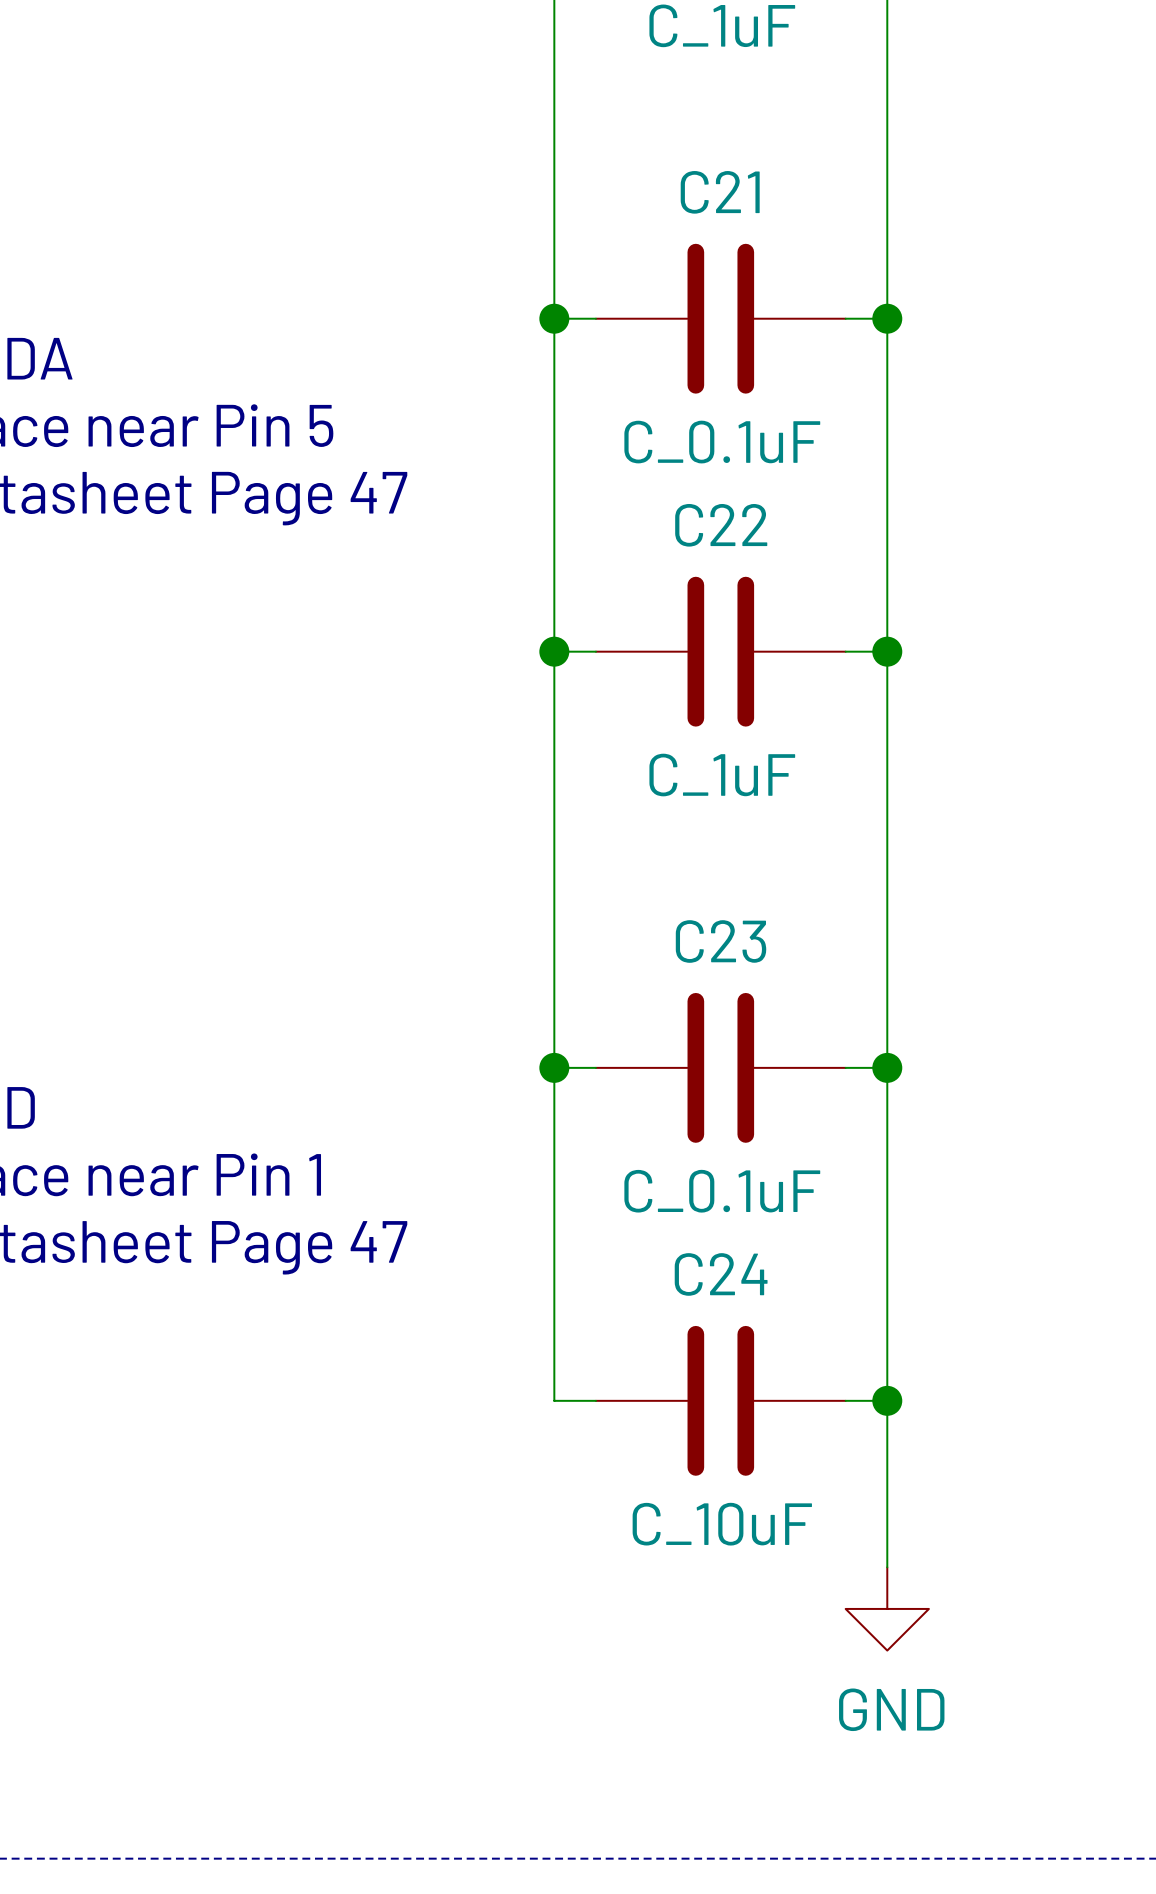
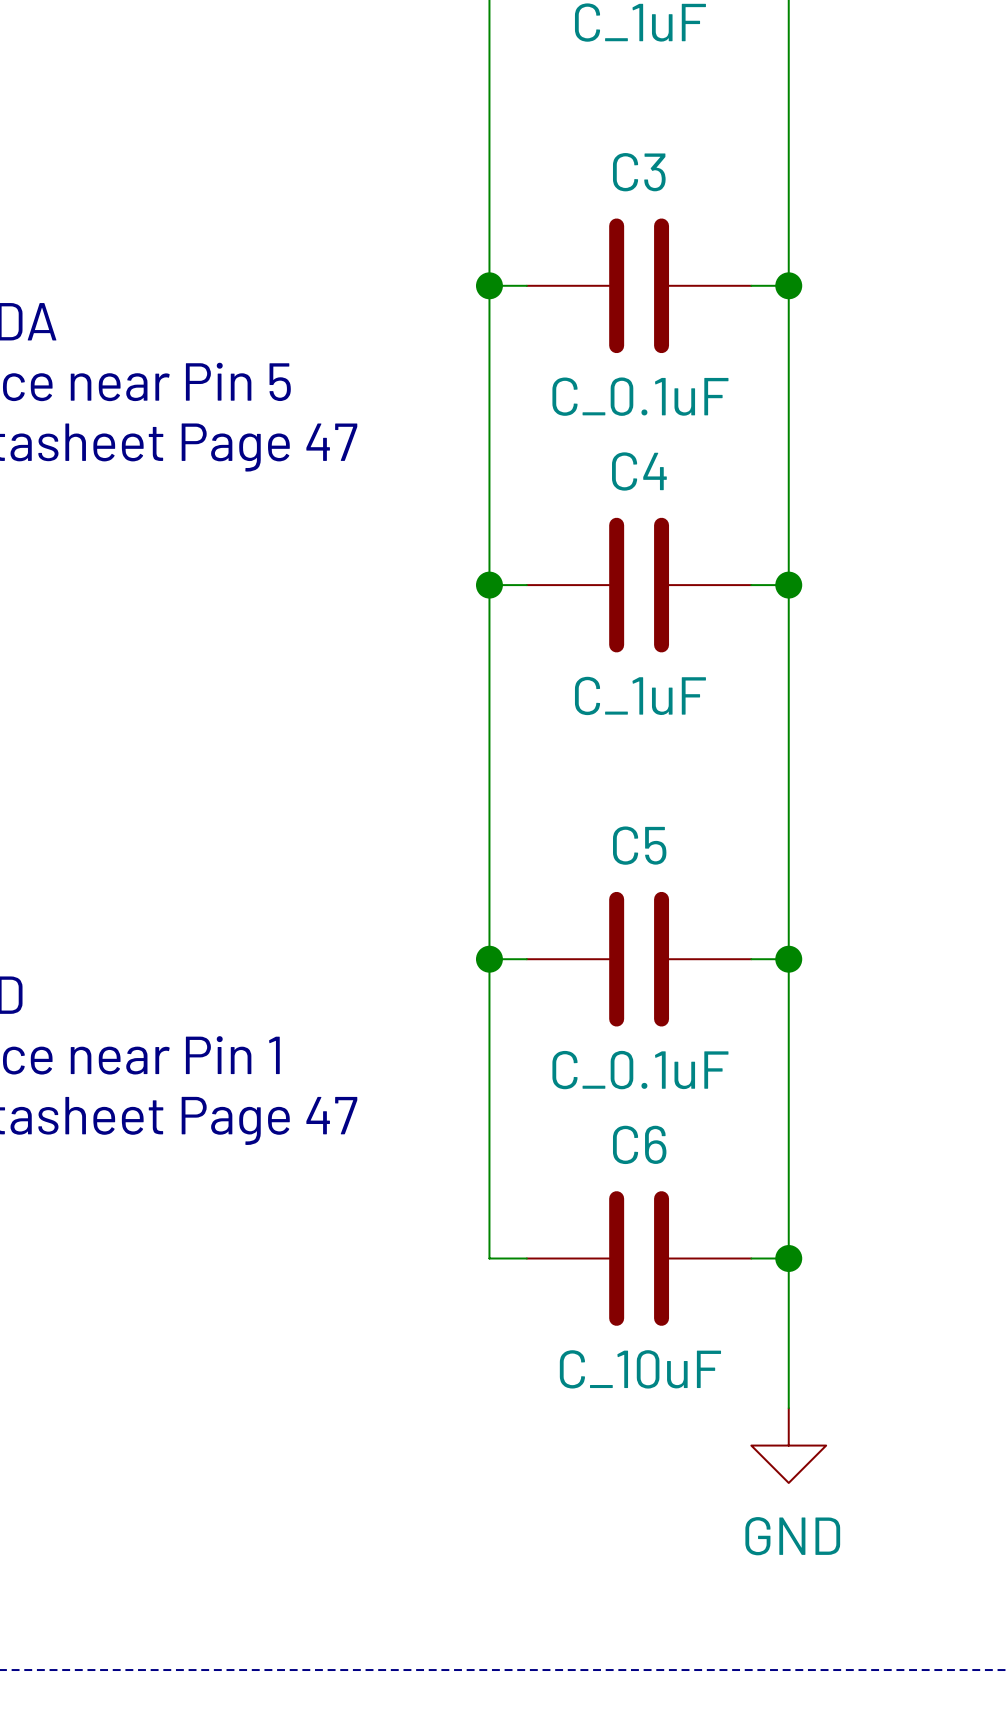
C21 name: C21 (720, 192) -> C3 (639, 172)
C22 name: C22 (721, 525) -> C4 (639, 471)
C23 name: C23 (721, 941) -> C5 (639, 845)
C24 name: C24 (721, 1274) -> C6 (639, 1144)

